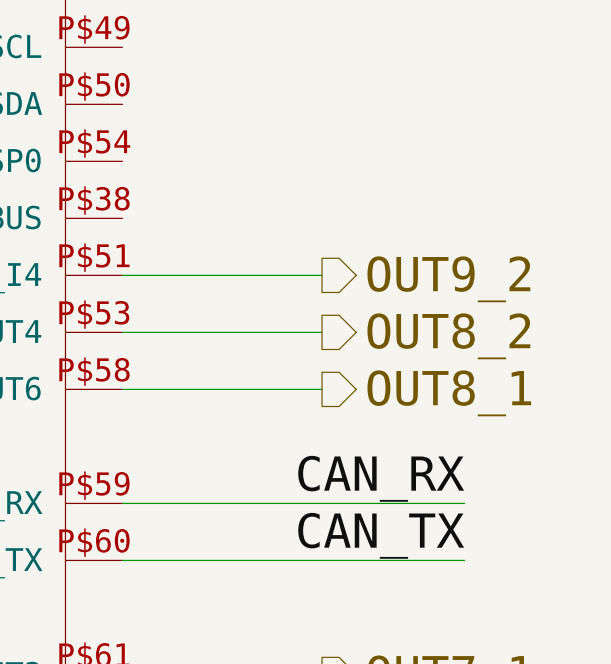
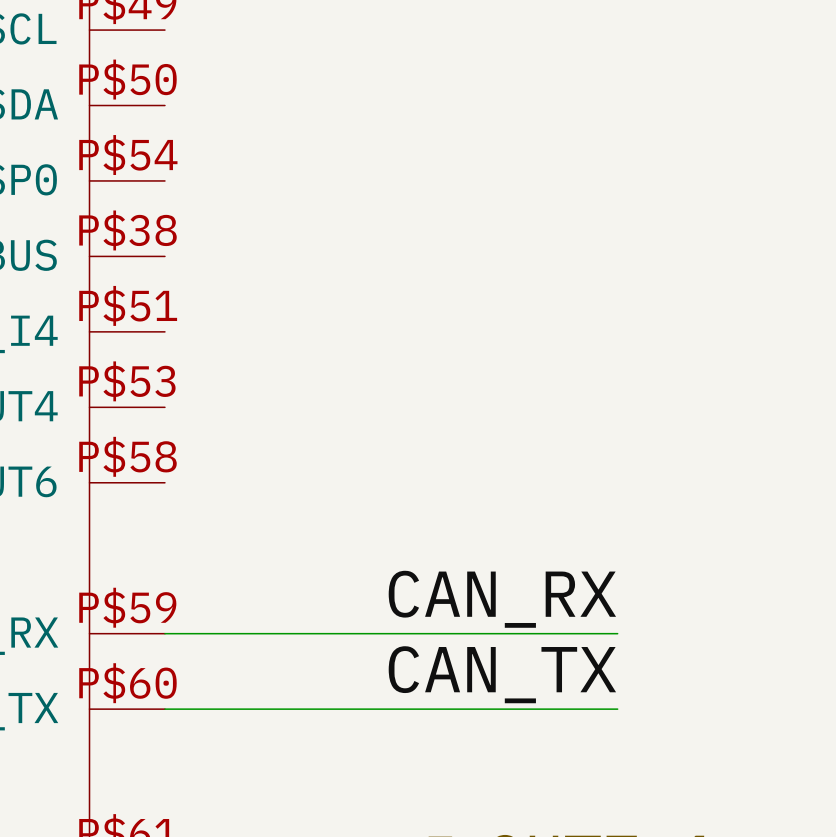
wire: (122, 275) (322, 275) -> none
hierarchical label: OUT9_2 (448, 279) -> none
wire: (122, 332) (322, 332) -> none
hierarchical label: OUT8_2 (448, 336) -> none
wire: (122, 389) (322, 389) -> none
hierarchical label: OUT8_1 (449, 393) -> none

